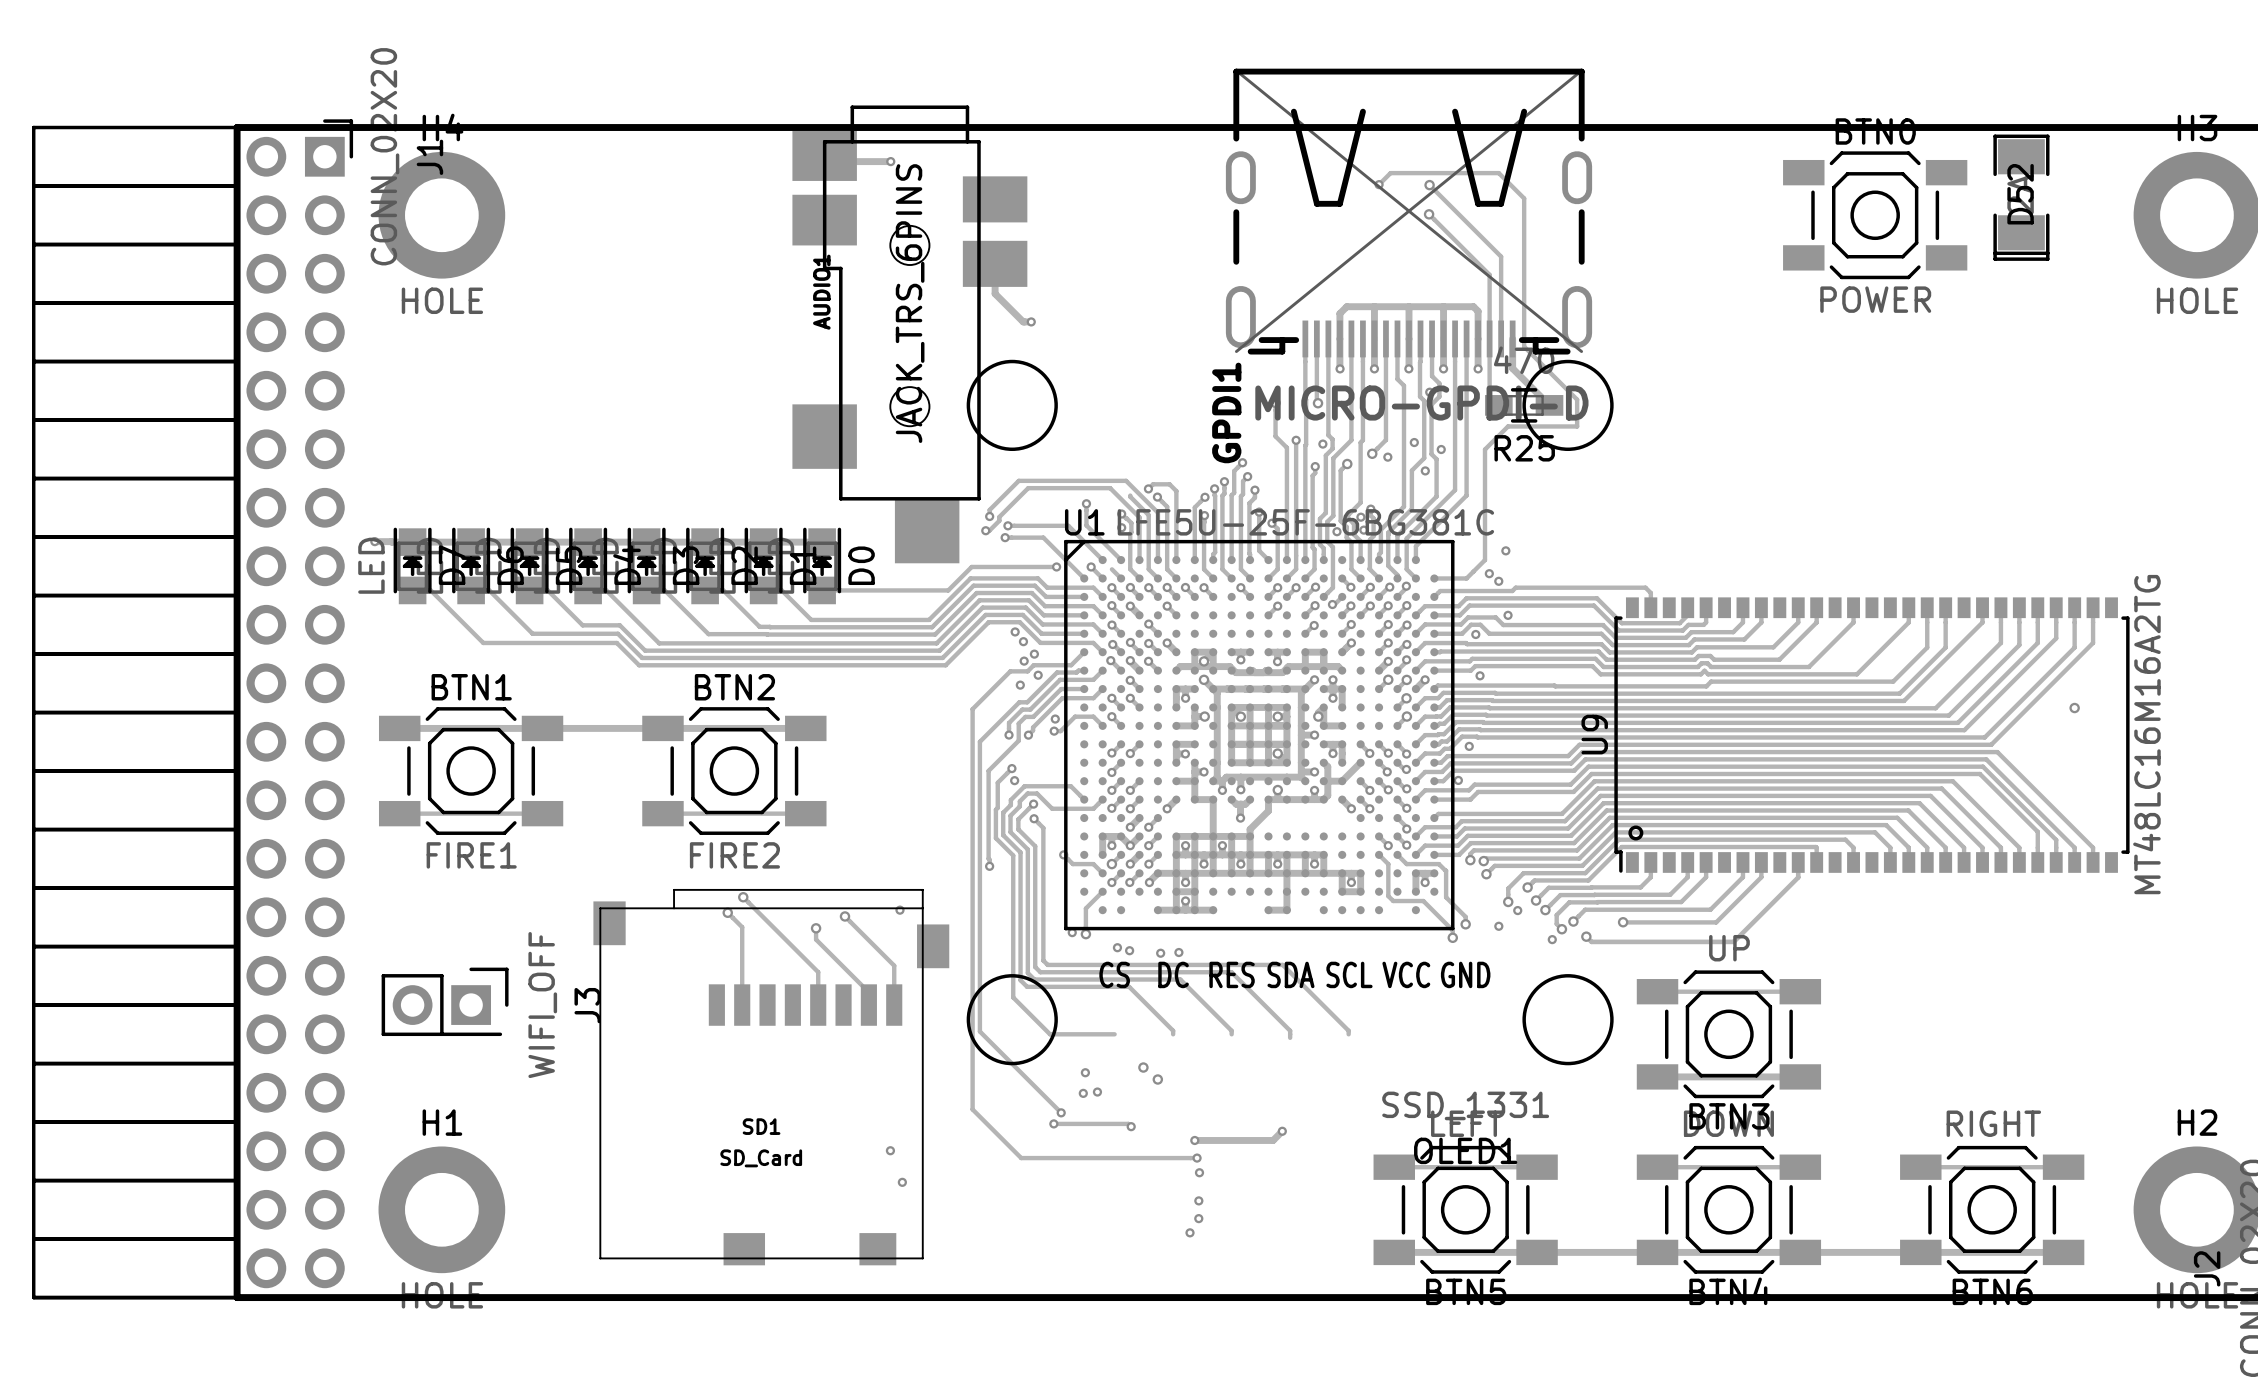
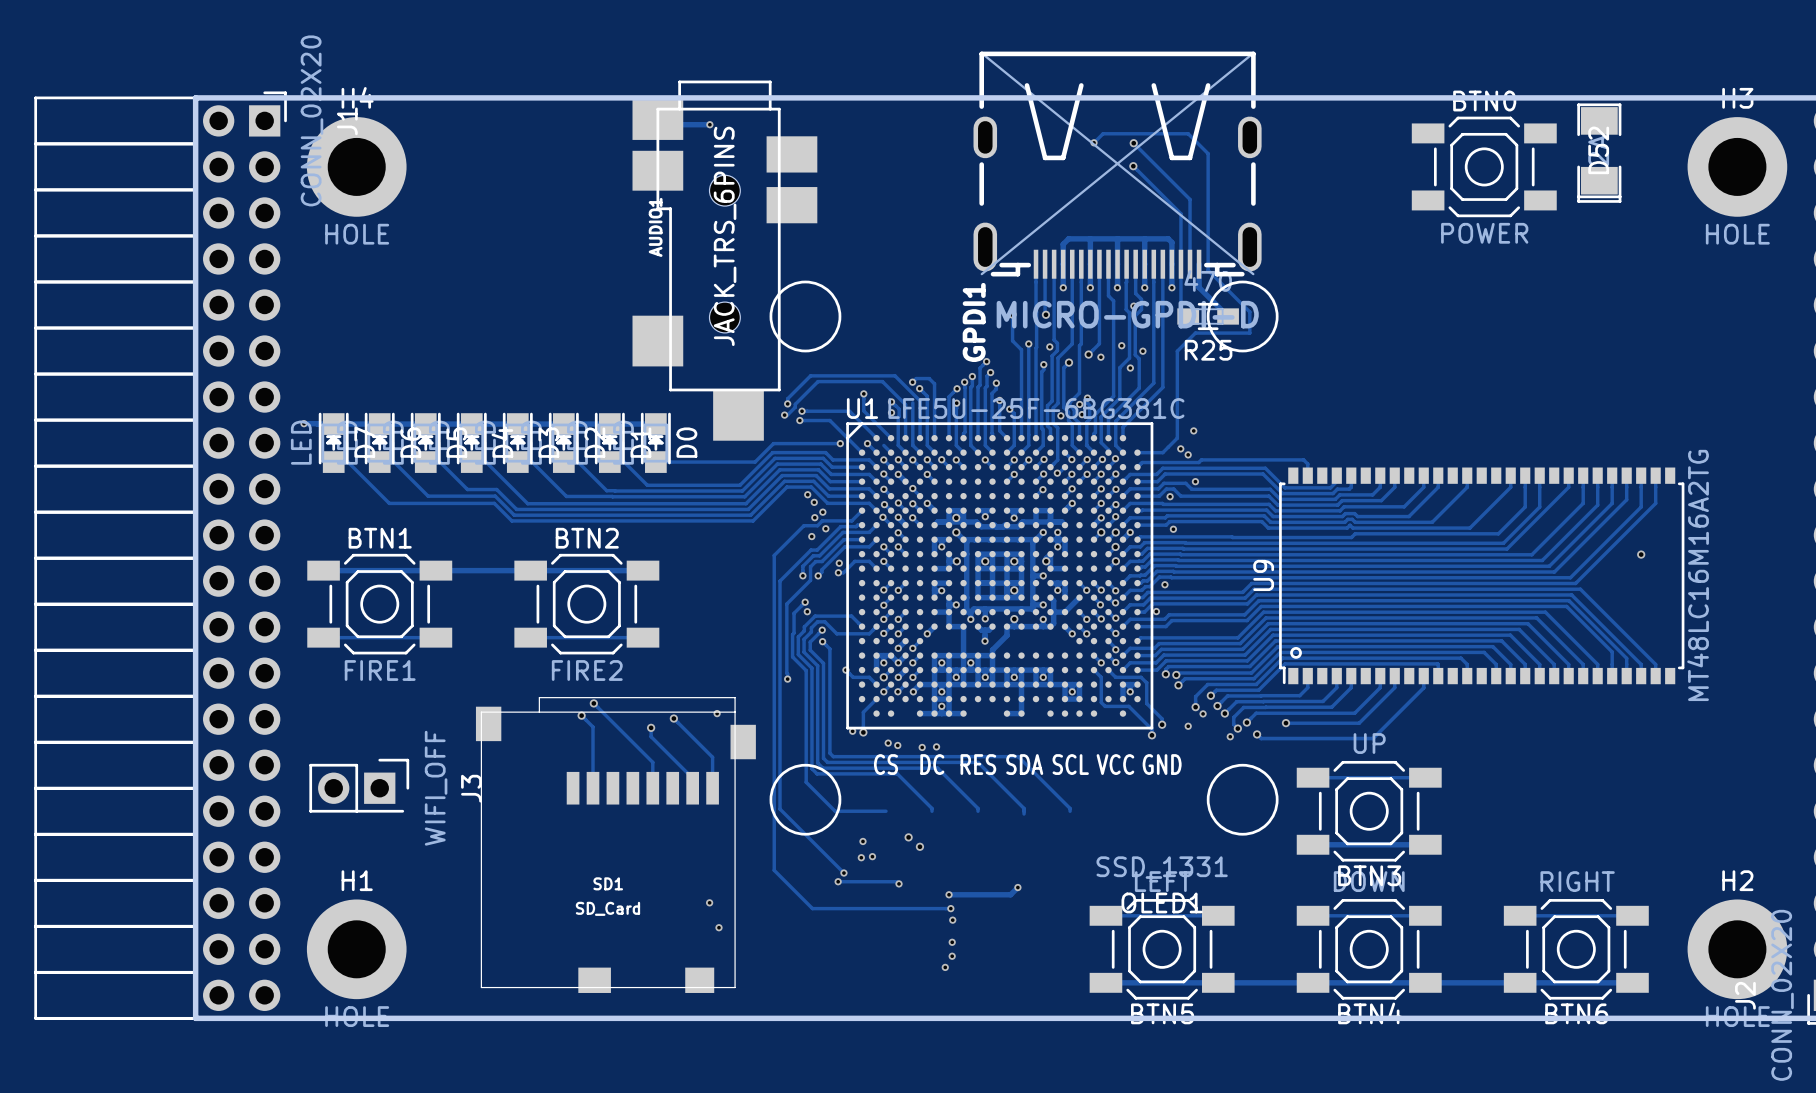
track: (995, 263) (995, 293) (1023, 321) (1031, 321) -> none
via: (1031, 321) -> none
track: (1130, 495) (1148, 515) -> none

